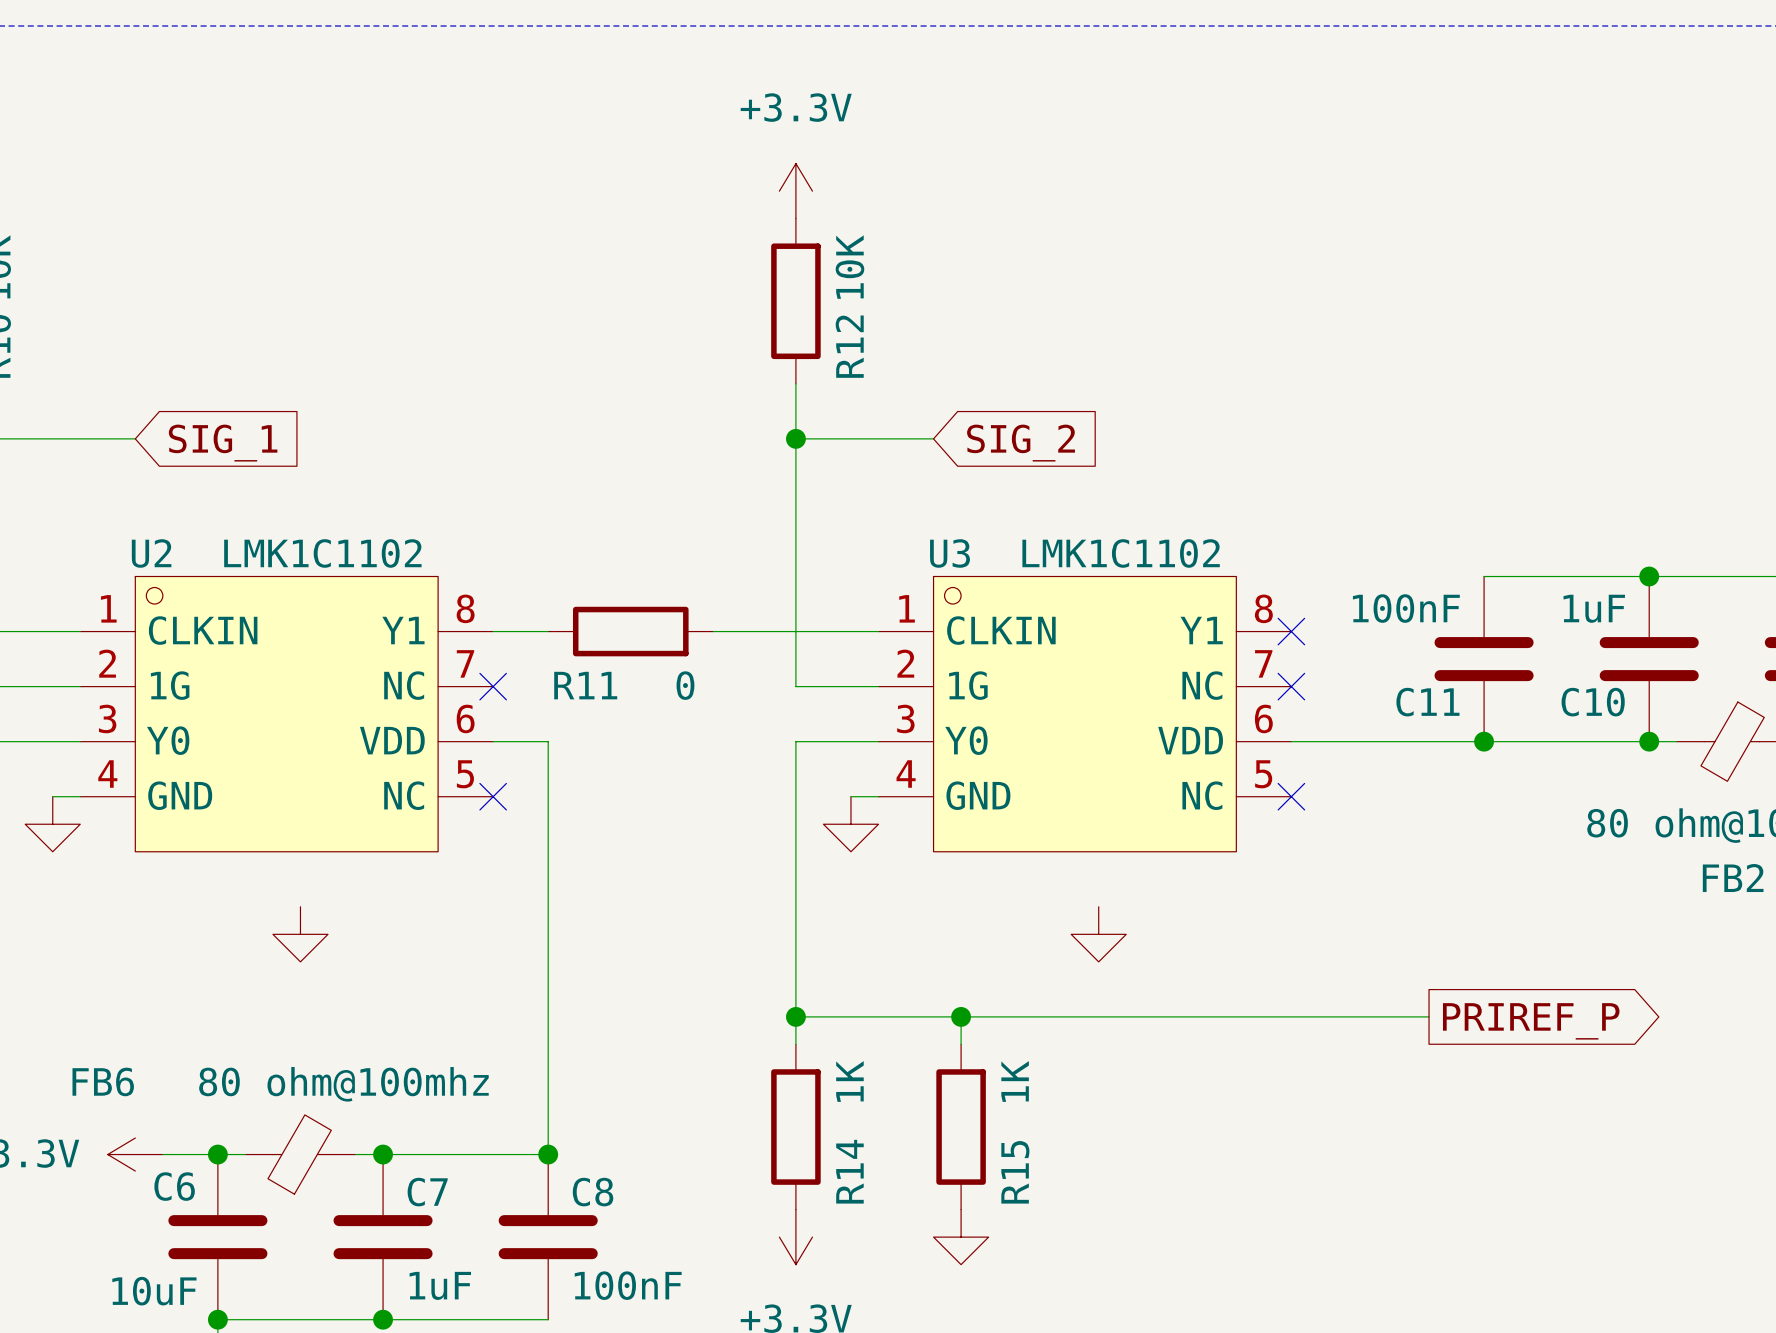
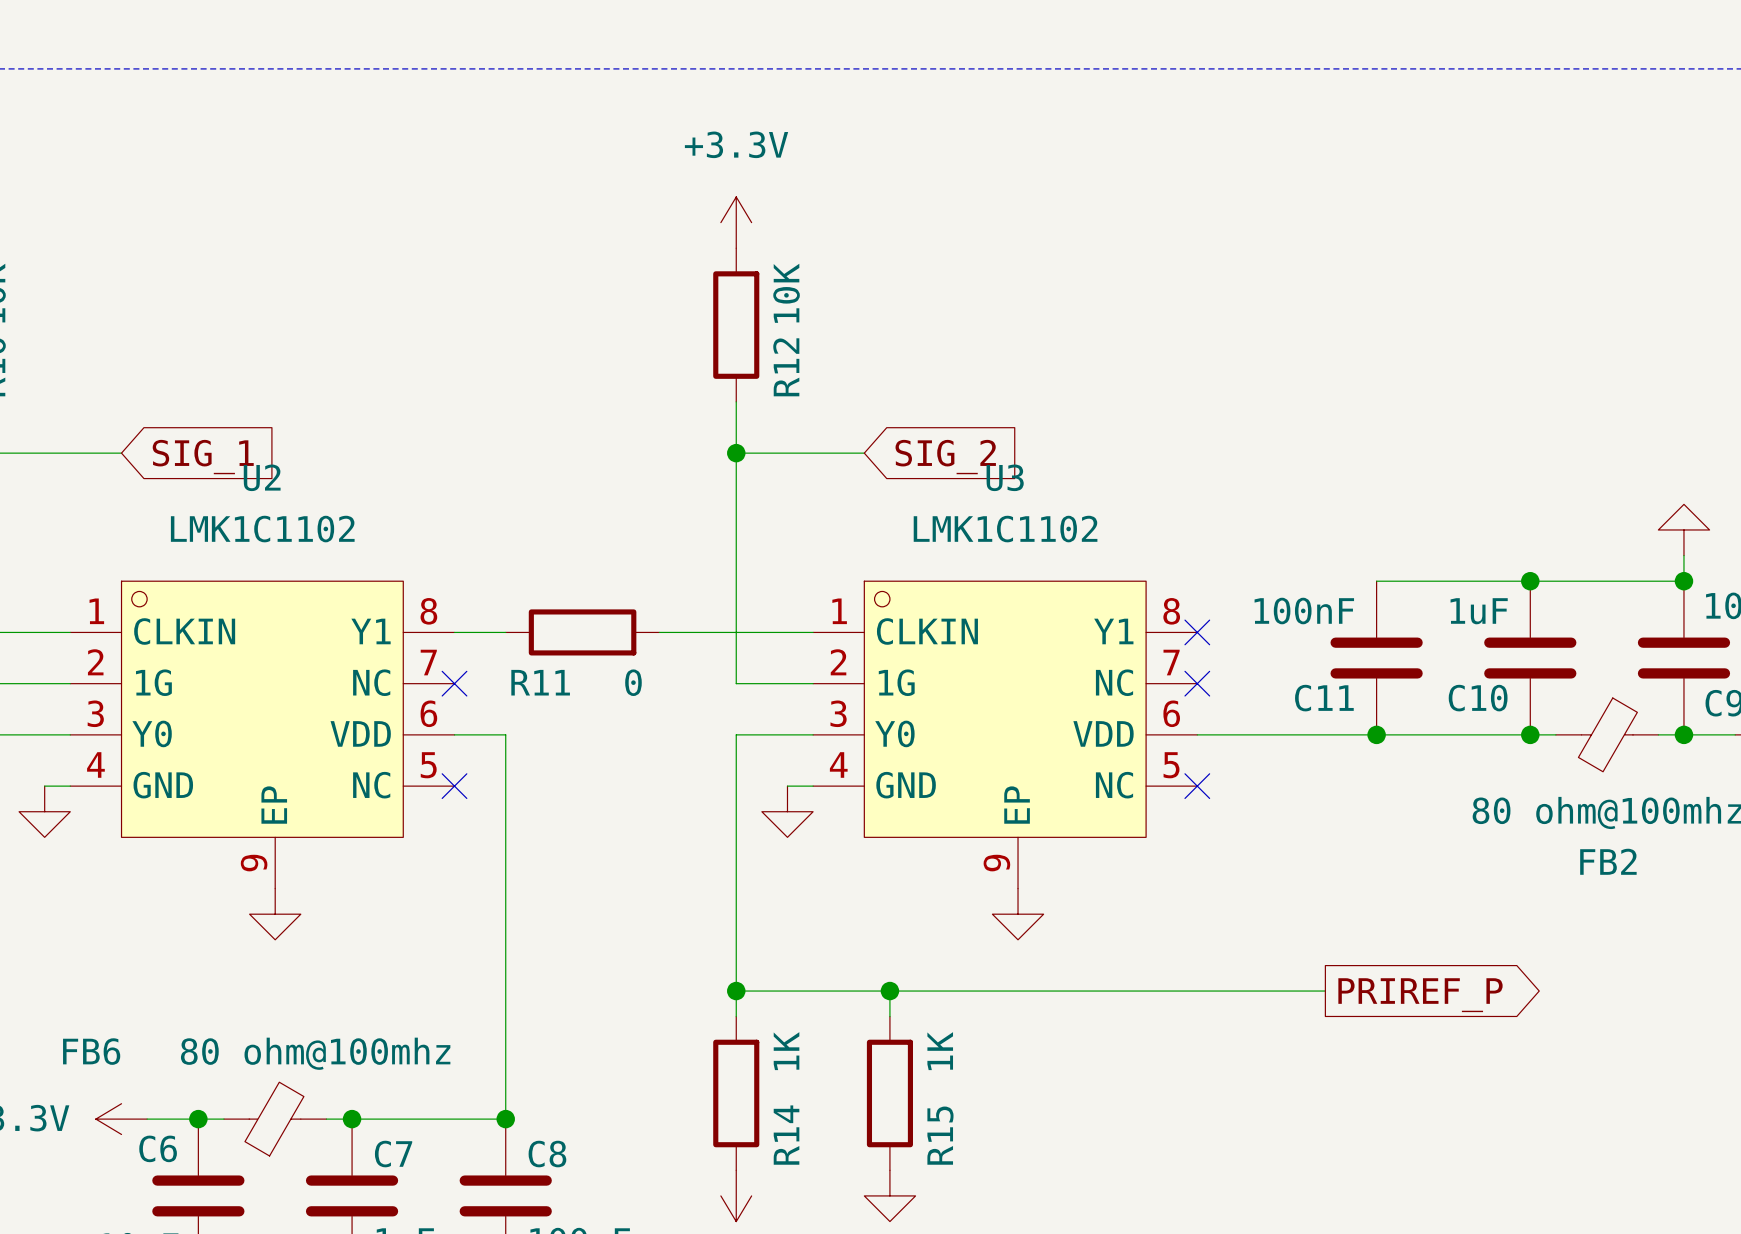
U2 name position: U2 (151, 553) -> U2 (262, 477)
U2 value position: LMK1C1102 (322, 553) -> LMK1C1102 (262, 529)
U3 name position: U3 (950, 553) -> U3 (1005, 477)
U3 value position: LMK1C1102 (1121, 553) -> LMK1C1102 (1005, 529)
U2 symbol: [80, 576, 494, 852] -> [70, 581, 455, 889]
U3 symbol: [878, 576, 1292, 852] -> [813, 581, 1198, 889]

